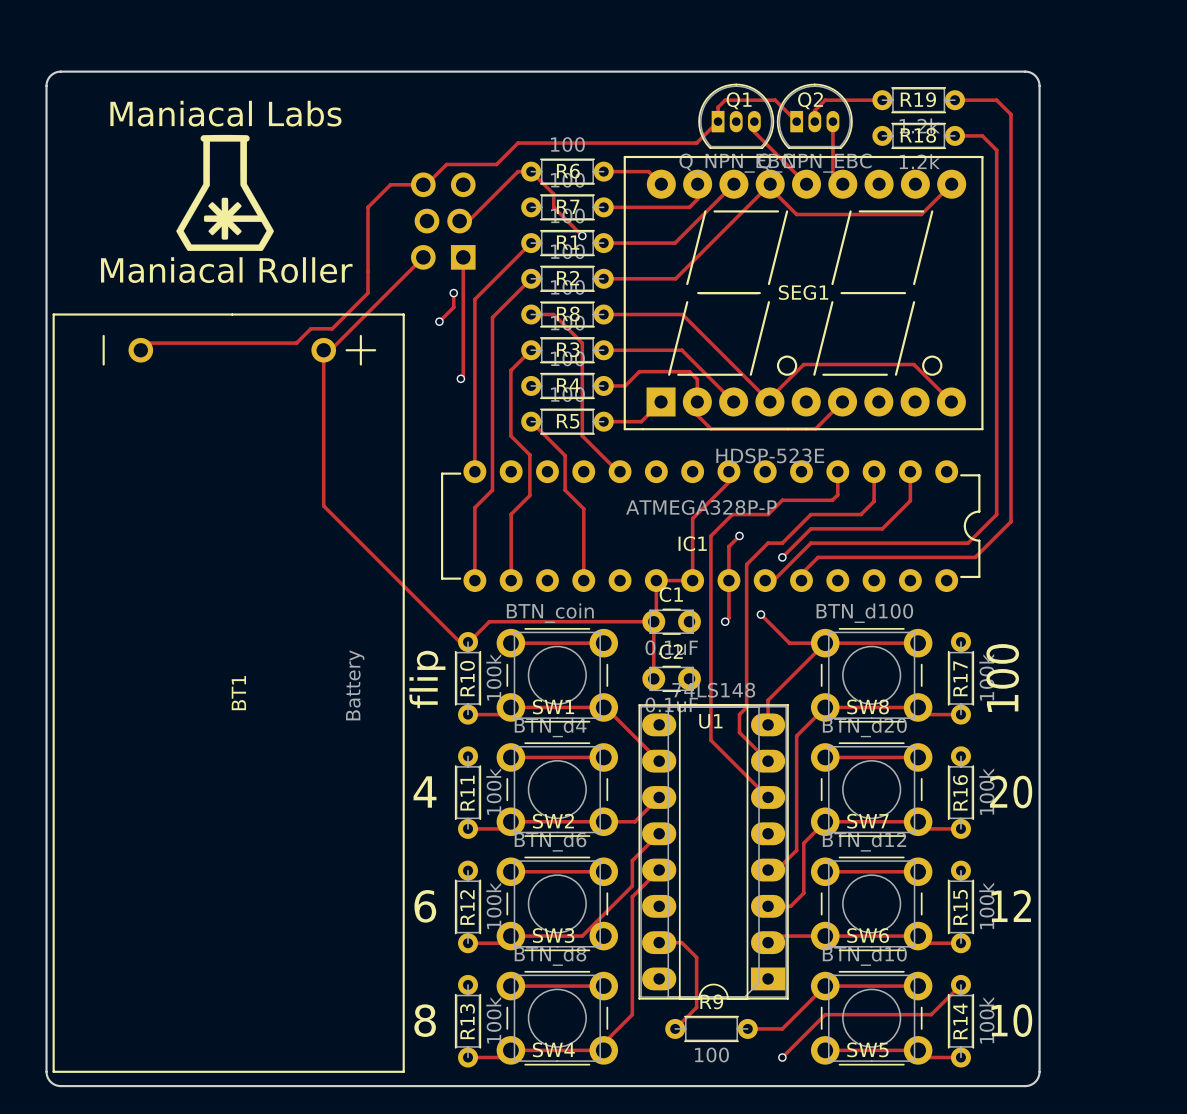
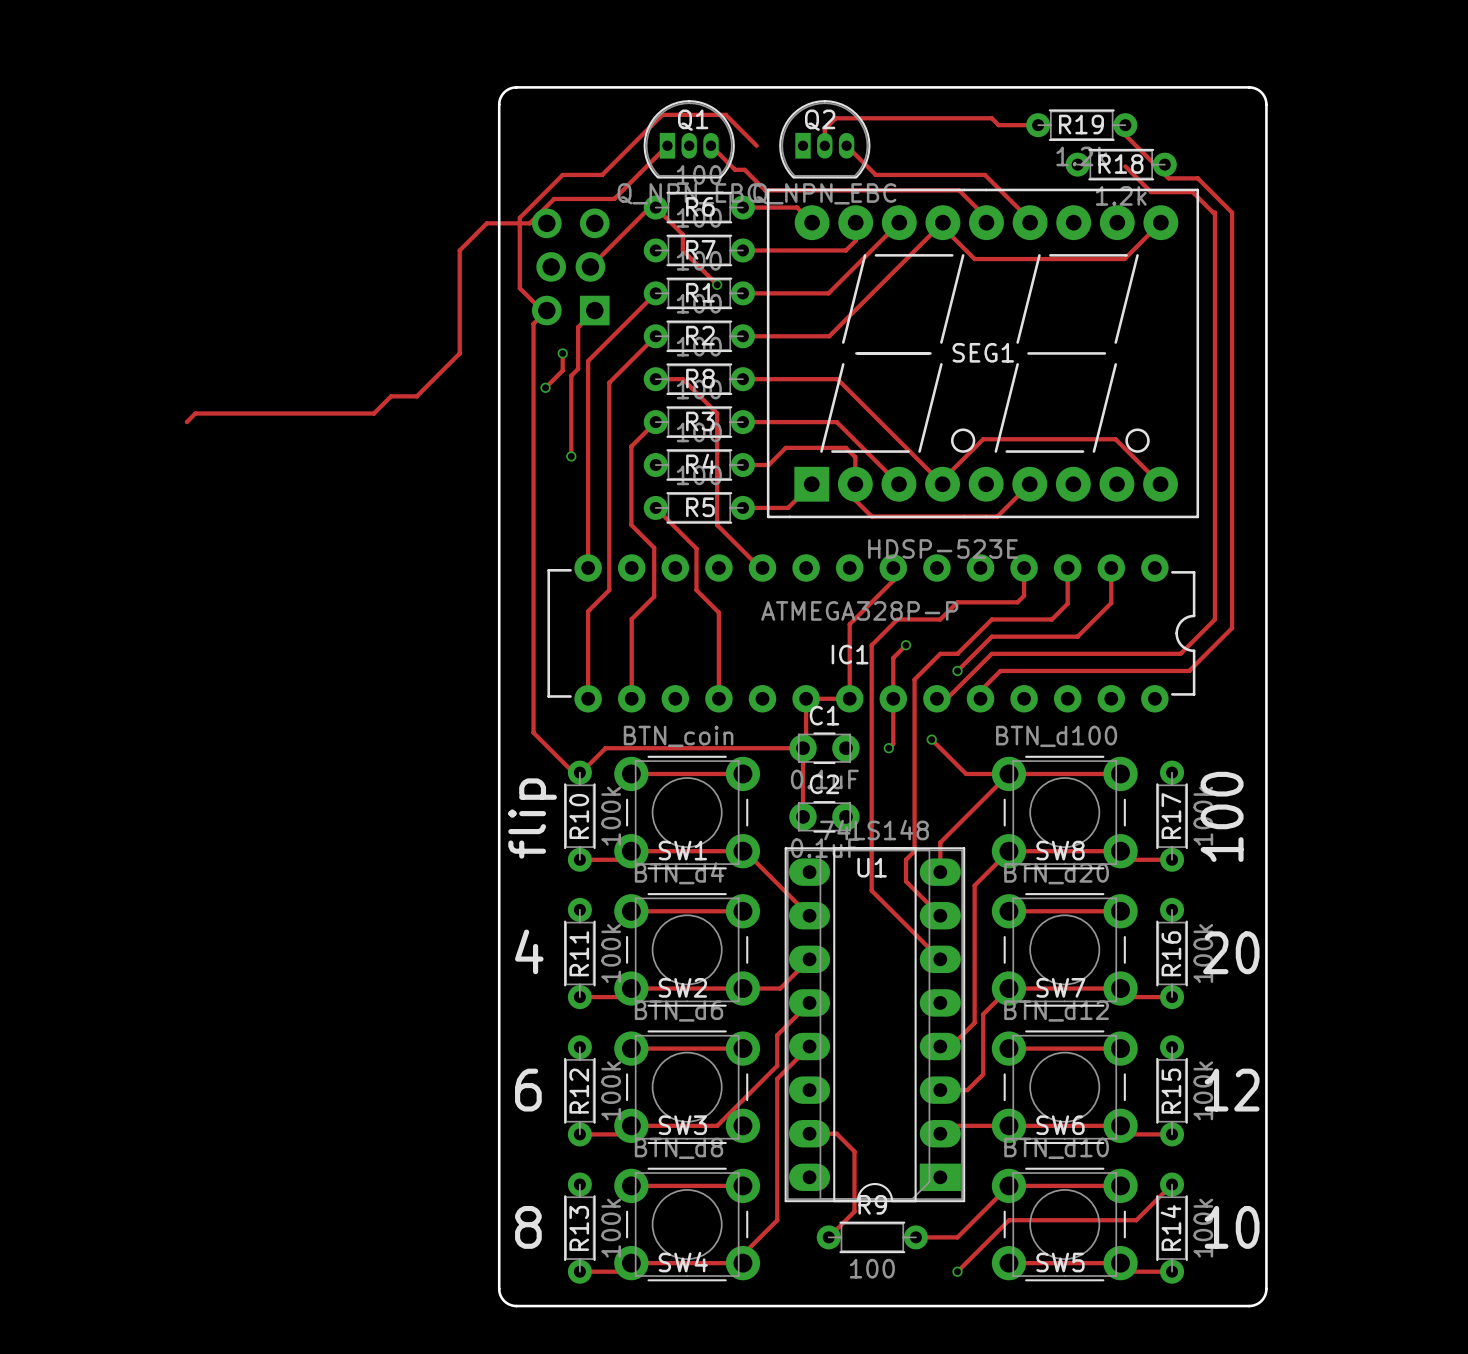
board edge: (415, 71) (60, 71) (50, 75) (46, 85) (47, 1077) (52, 1083) (60, 1086) (415, 1086) -> (516, 87) (504, 92) (499, 104) (499, 1288) (504, 1301) (516, 1306)
track: (882, 100) (825, 100) (814, 110) (814, 121) -> none
R19 position: (918, 100) -> (1081, 125)
track: (954, 100) (996, 100) (1010, 114) (1010, 175) -> (1125, 125) (1125, 135) (1168, 178) (1197, 178) (1232, 212)
track: none -> (1038, 125) (998, 125) (991, 118) (835, 118) (824, 129) (824, 145)
text: Maniacal Labs (225, 113) -> none
Q1 position: (736, 116) -> (689, 139)
Q2 position: (814, 116) -> (824, 139)
track: (754, 121) (754, 132) (806, 184) -> (711, 145) (735, 169) (744, 169) (765, 190) (959, 190) (986, 217) (986, 222)
track: (796, 121) (775, 100) (725, 100) (718, 107) (718, 121) (696, 143) (518, 143) -> (667, 145) (639, 173)
track: (832, 121) (832, 174) (842, 184) -> (846, 145) (875, 174) (984, 174) (1030, 220) (1030, 222)
drawing: [176, 134, 274, 251] -> none
track: (954, 135) (982, 135) (996, 150) (996, 175) -> (1125, 166) (1151, 192) (1192, 192) (1214, 212)
track: (526, 171) (518, 171) (468, 221) (459, 221) -> (649, 207) (590, 266)
part position: (443, 221) -> (570, 266)
track: (423, 257) (330, 350) (323, 350) (323, 505) (459, 642) (462, 642) -> (756, 145) (725, 114) (662, 114) (602, 174) (562, 174) (519, 217) (519, 288) (542, 310) (546, 310) (533, 323) (533, 732) (573, 772)
track: (463, 257) (463, 376) (460, 378) -> (594, 310) (578, 327) (578, 368) (571, 375) (571, 456)
text: Maniacal Roller (226, 270) -> none
BT1: Battery (228, 693) -> none

